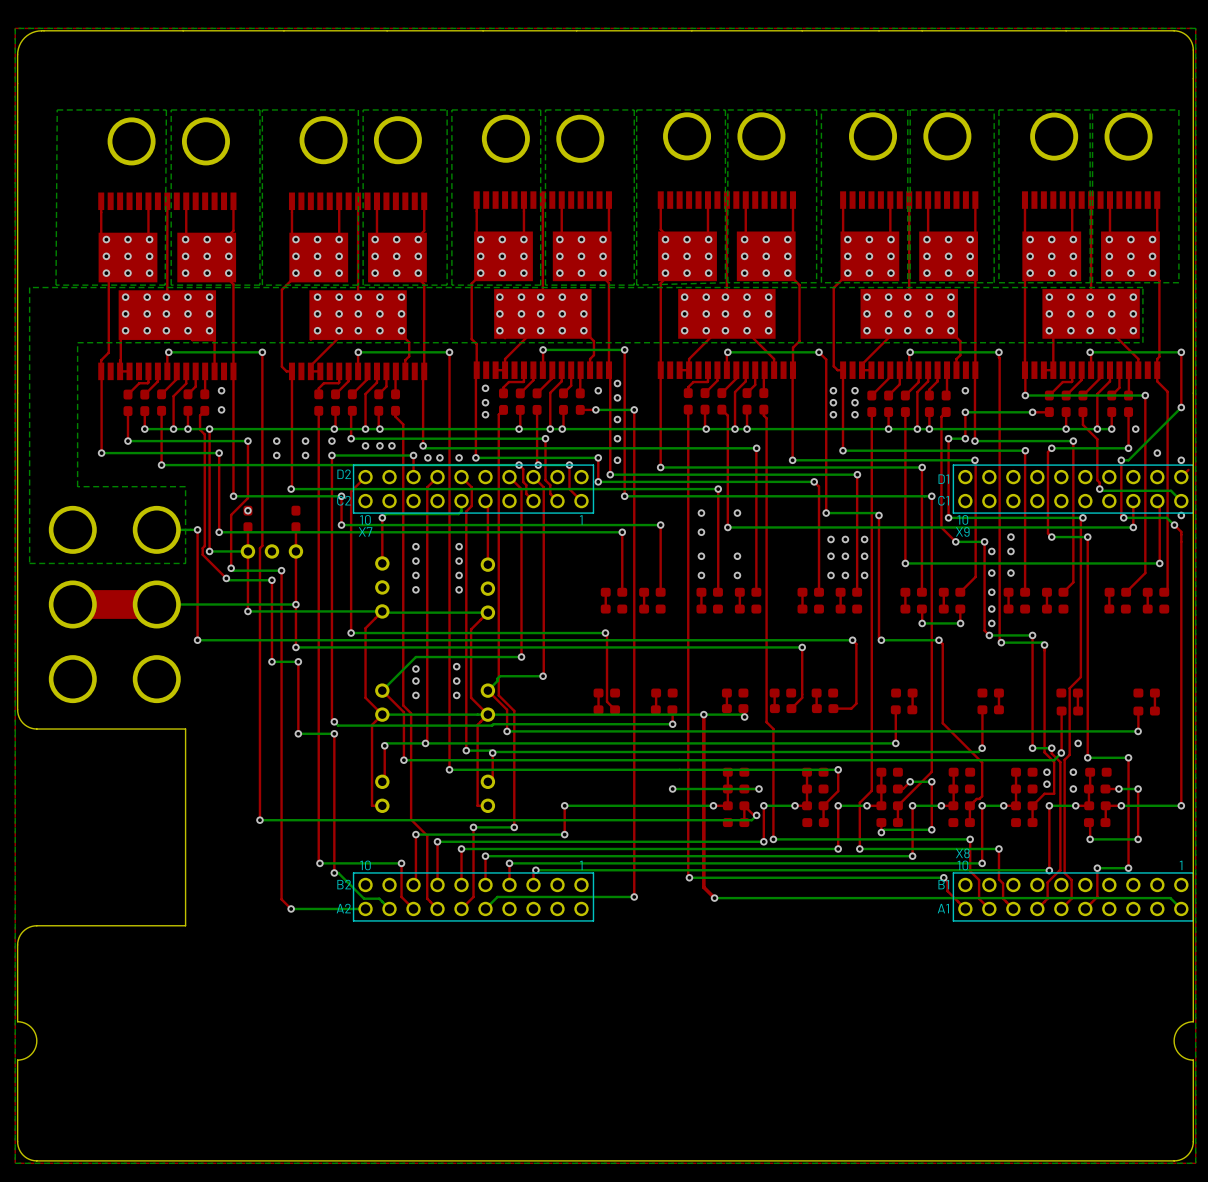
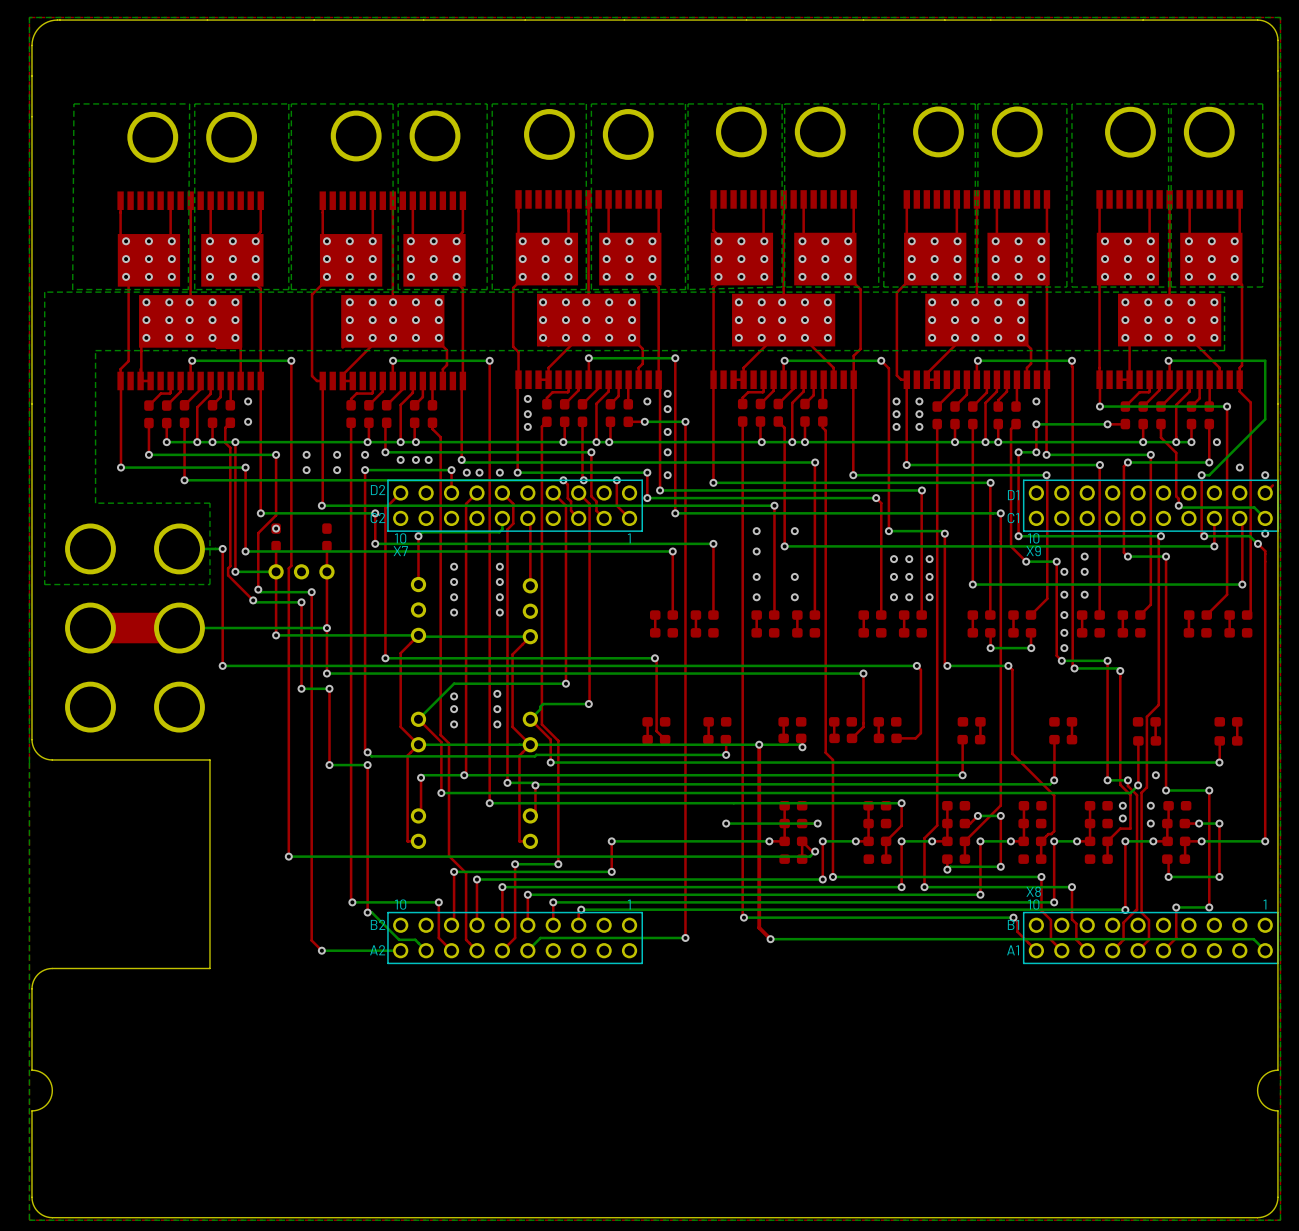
top track: (1181, 352) (1181, 407) -> none
bottom track: none -> (1265, 360) (1265, 419)
via: (1181, 352) -> none
via: (1181, 407) -> none

